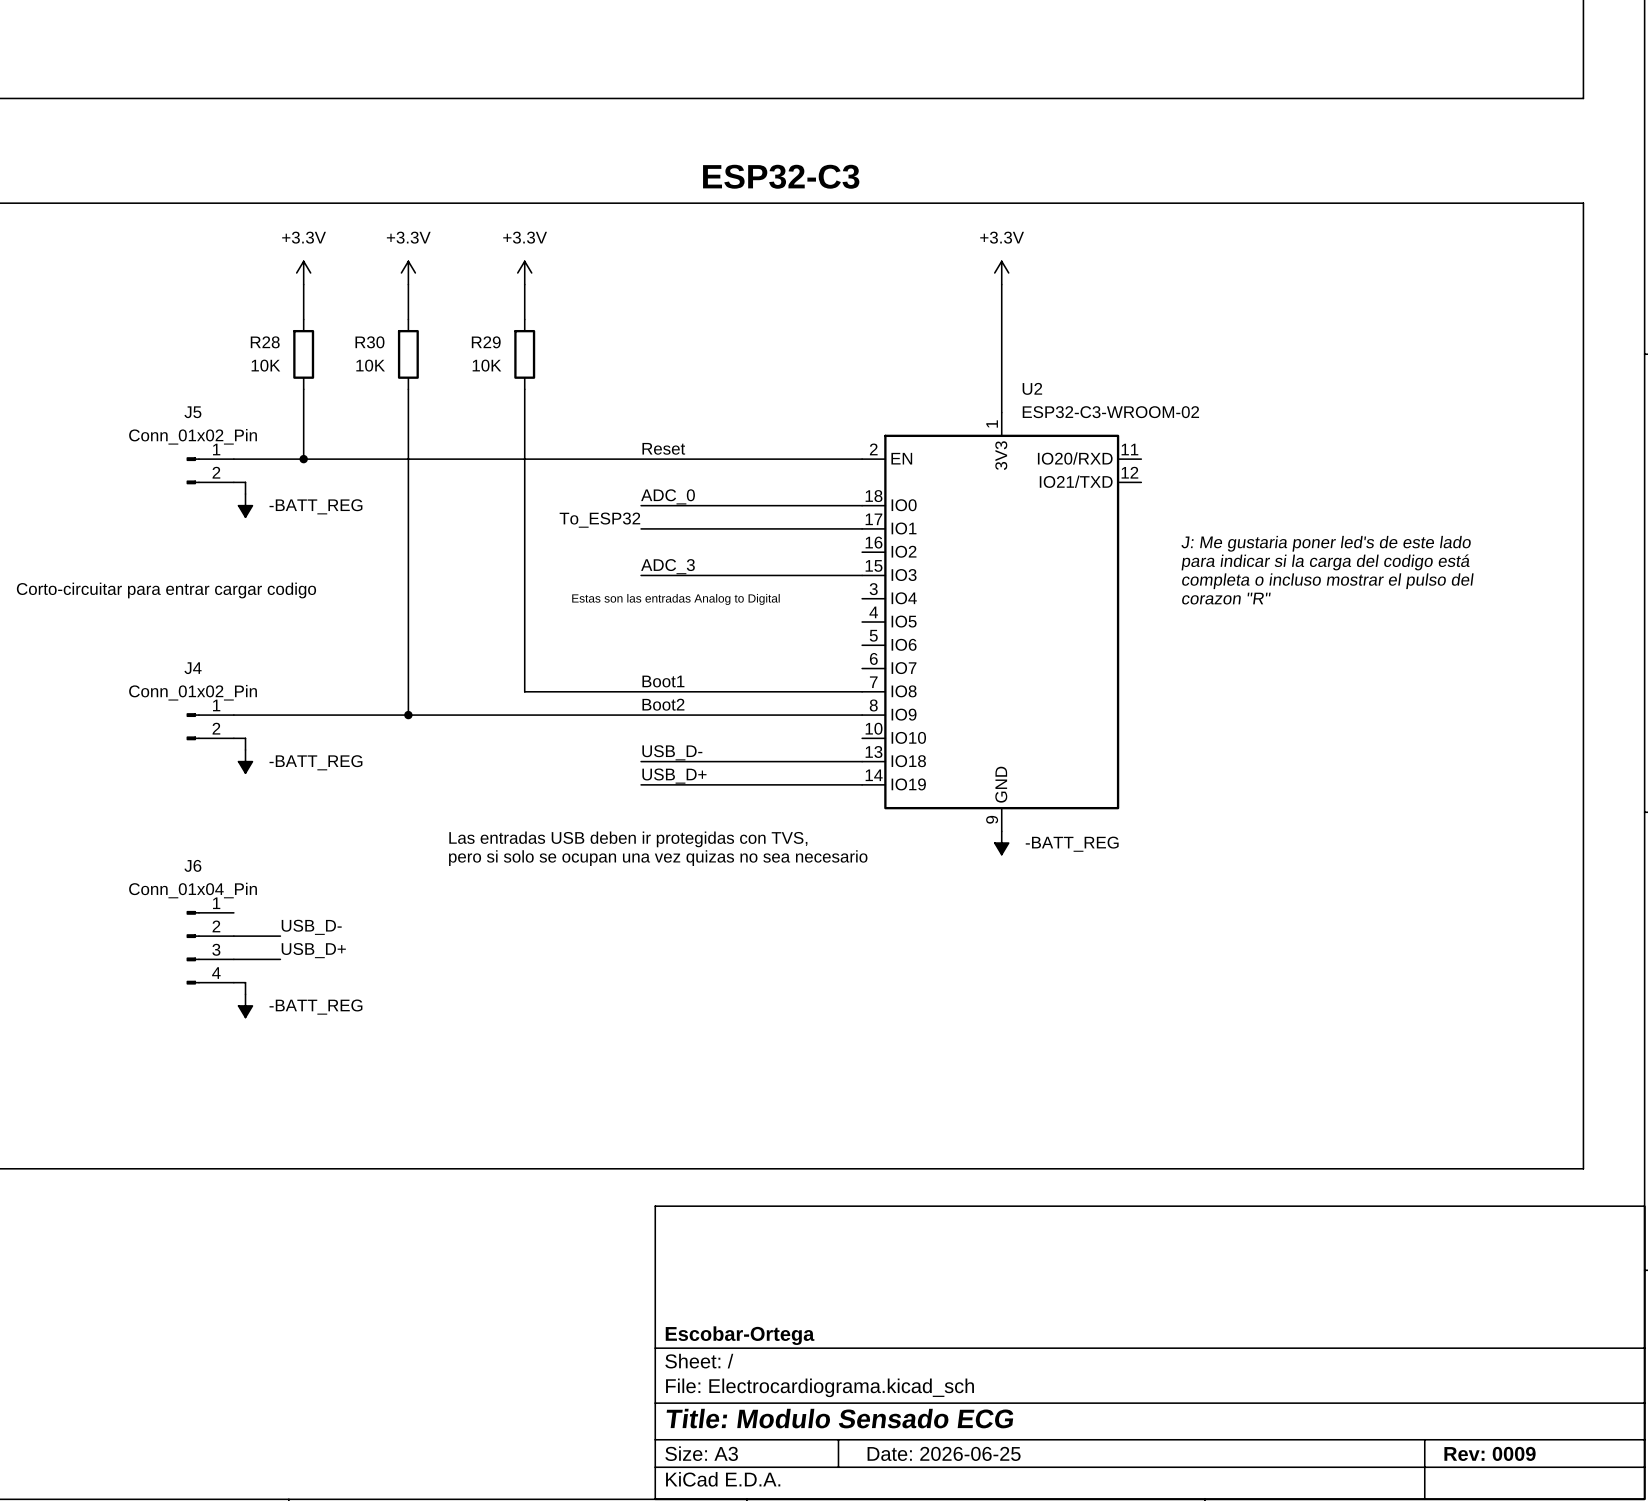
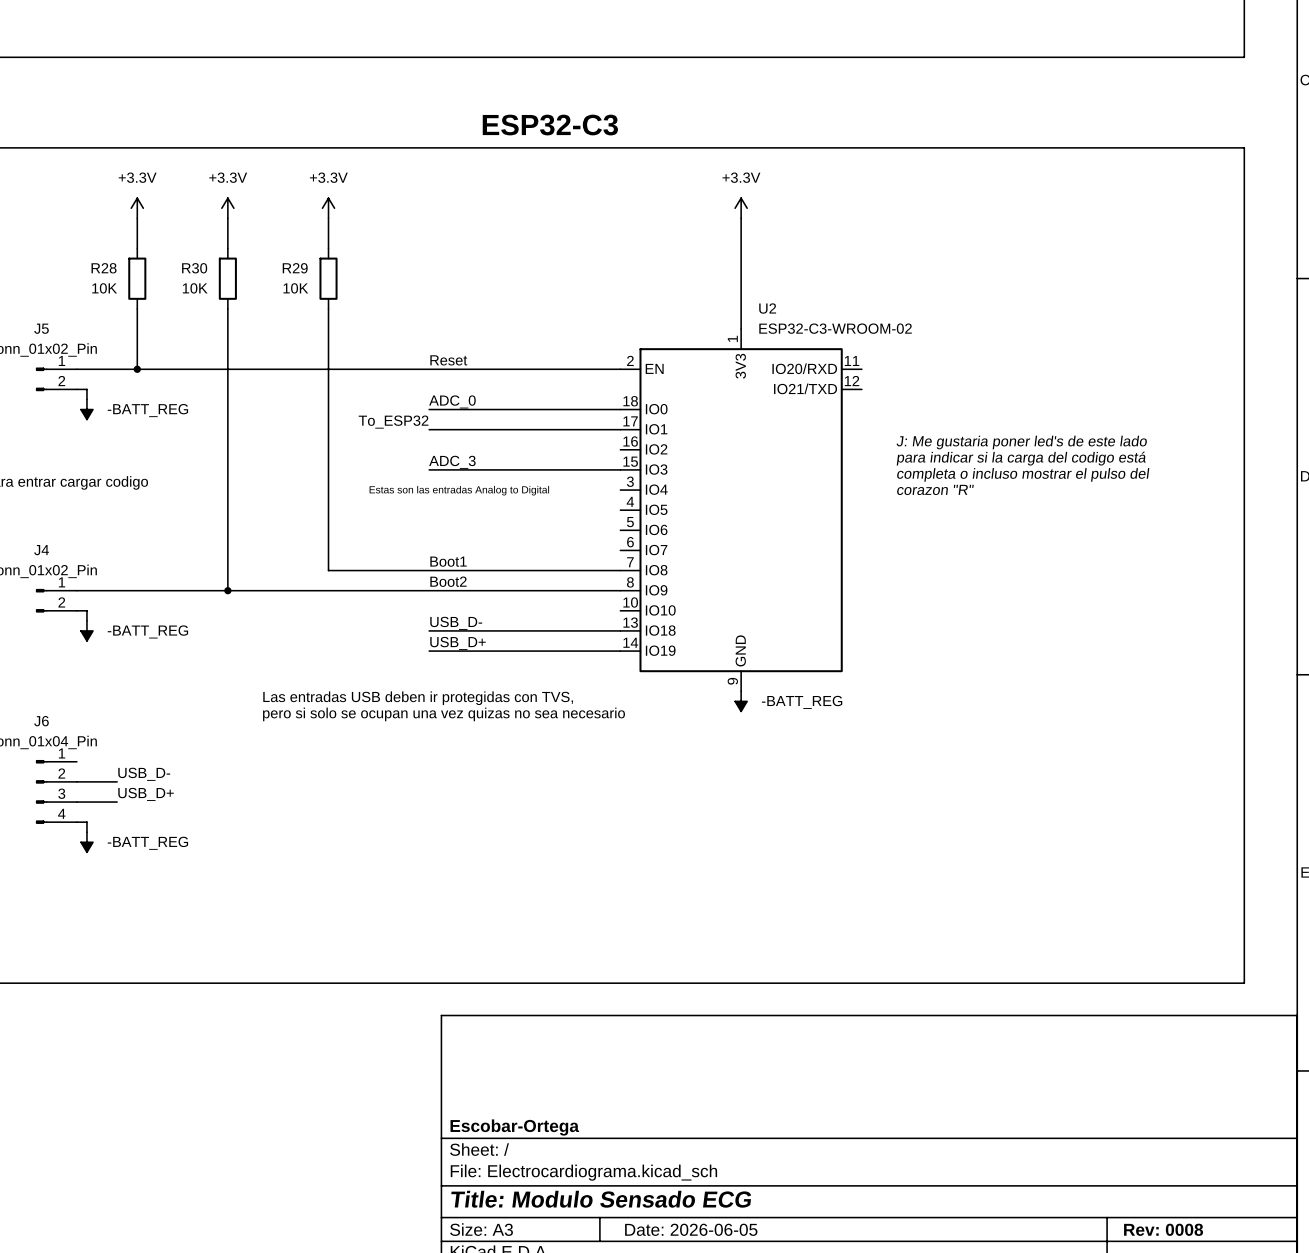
title block: Date: 2026-06-25 (944, 1453) -> Date: 2026-06-05 (691, 1229)
title block: Rev: 0009 (1490, 1453) -> Rev: 0008 (1163, 1229)

